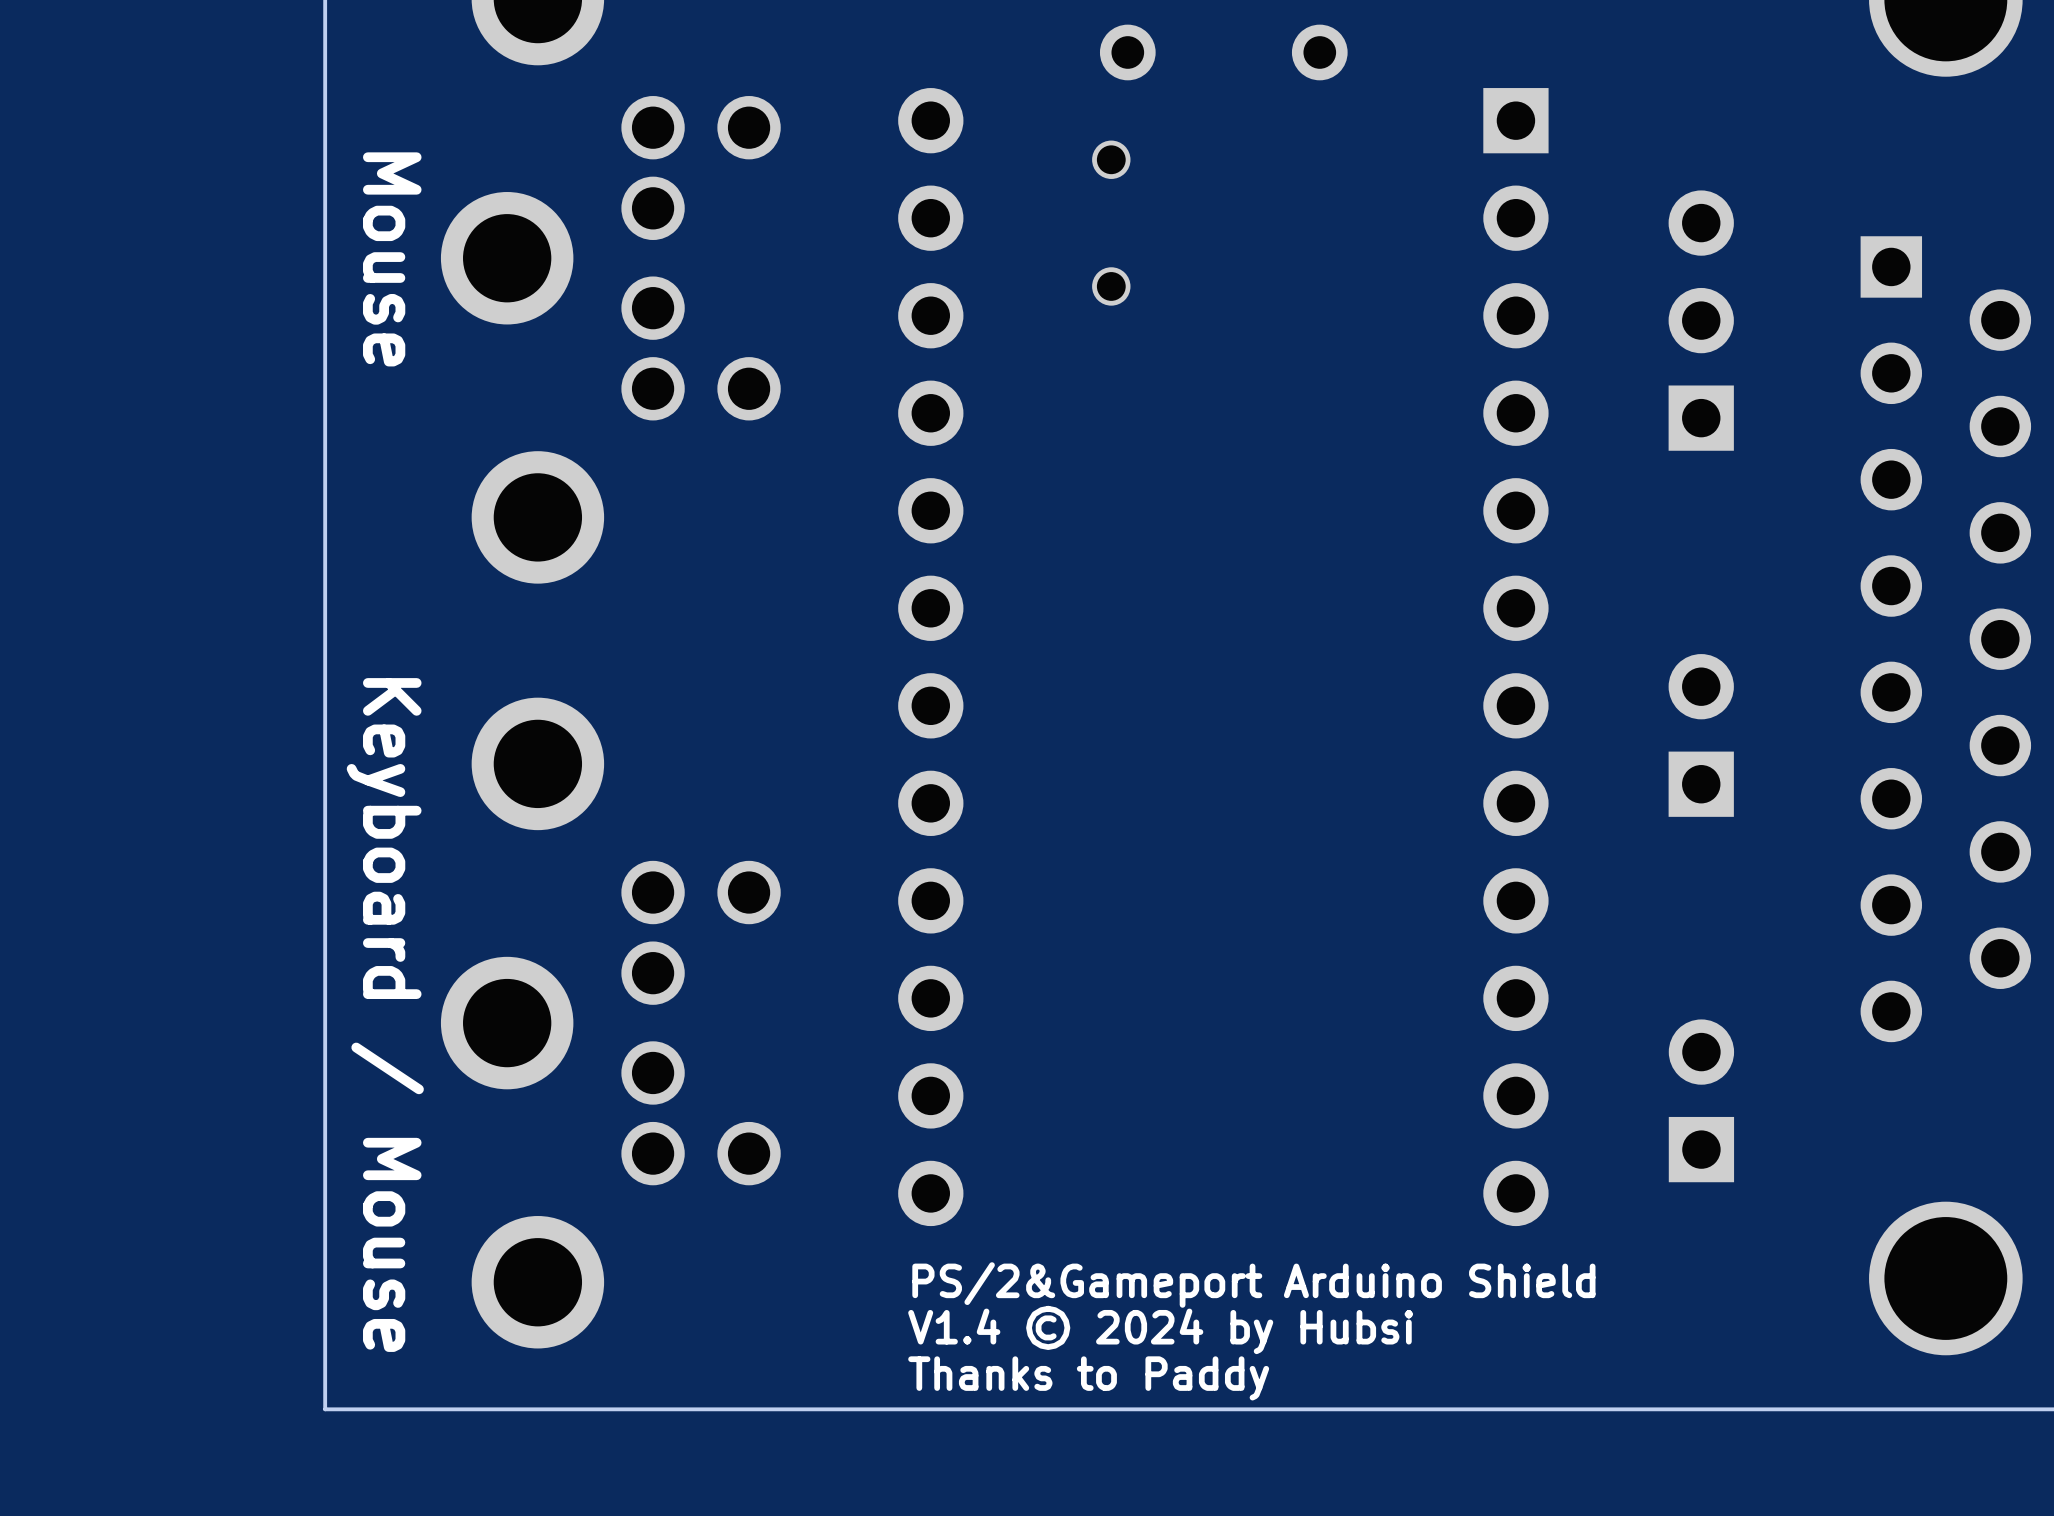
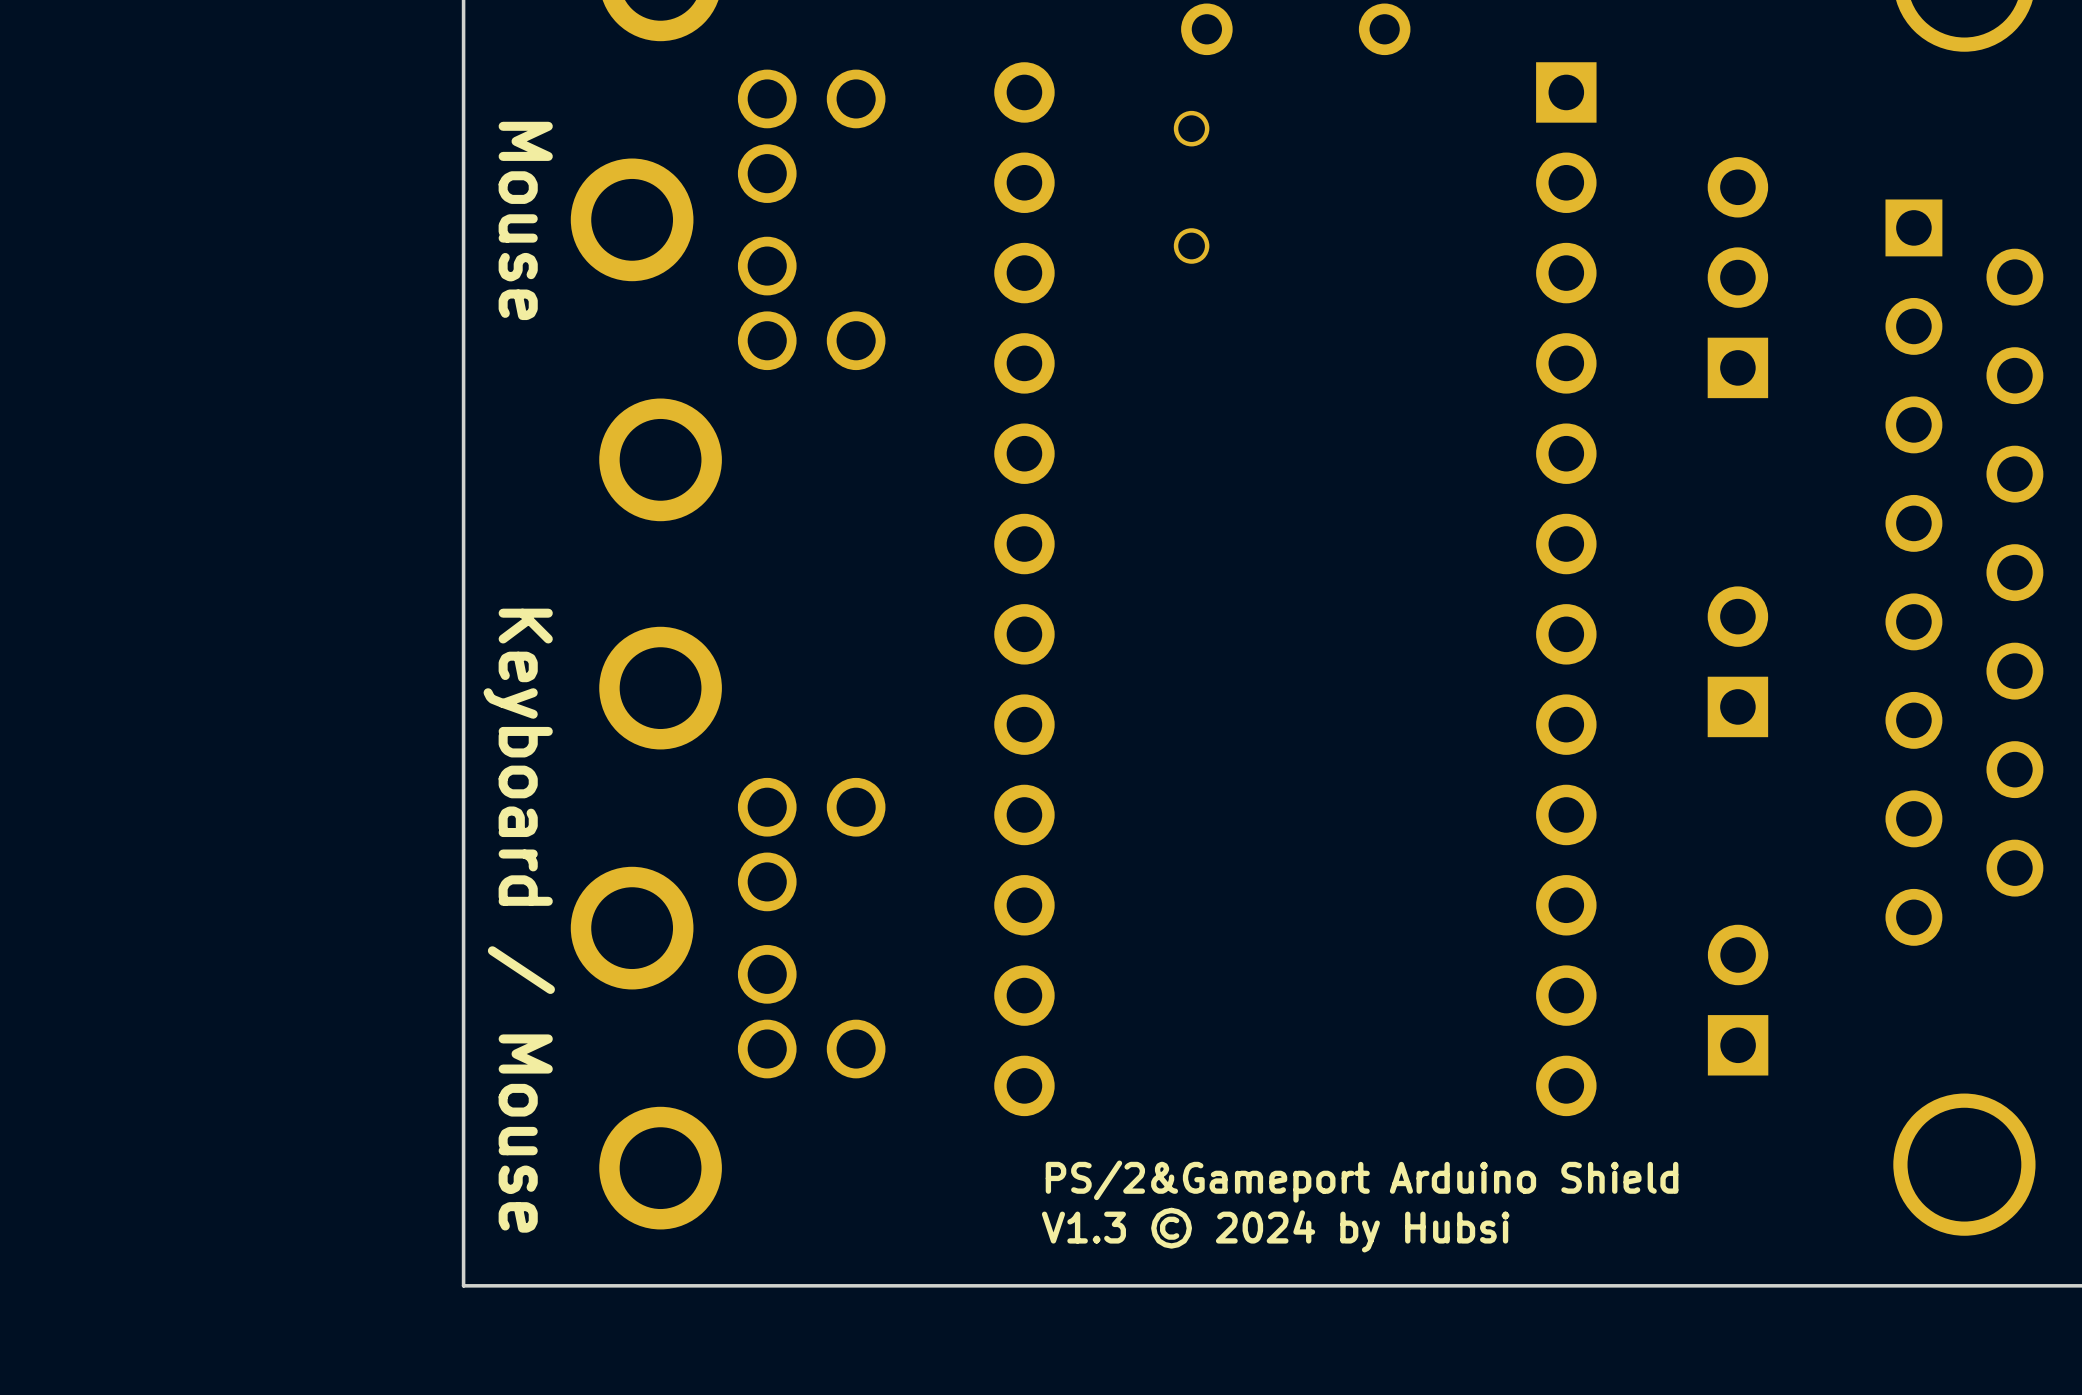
text position: PS/2&Gameport Arduino Shield (1253, 1284) -> PS/2&Gameport Arduino Shield (1362, 1181)
text: V1.4 © 2024 by Hubsi (1160, 1329) -> V1.3 © 2024 by Hubsi (1275, 1230)
text: Thanks to Paddy (1088, 1378) -> none

